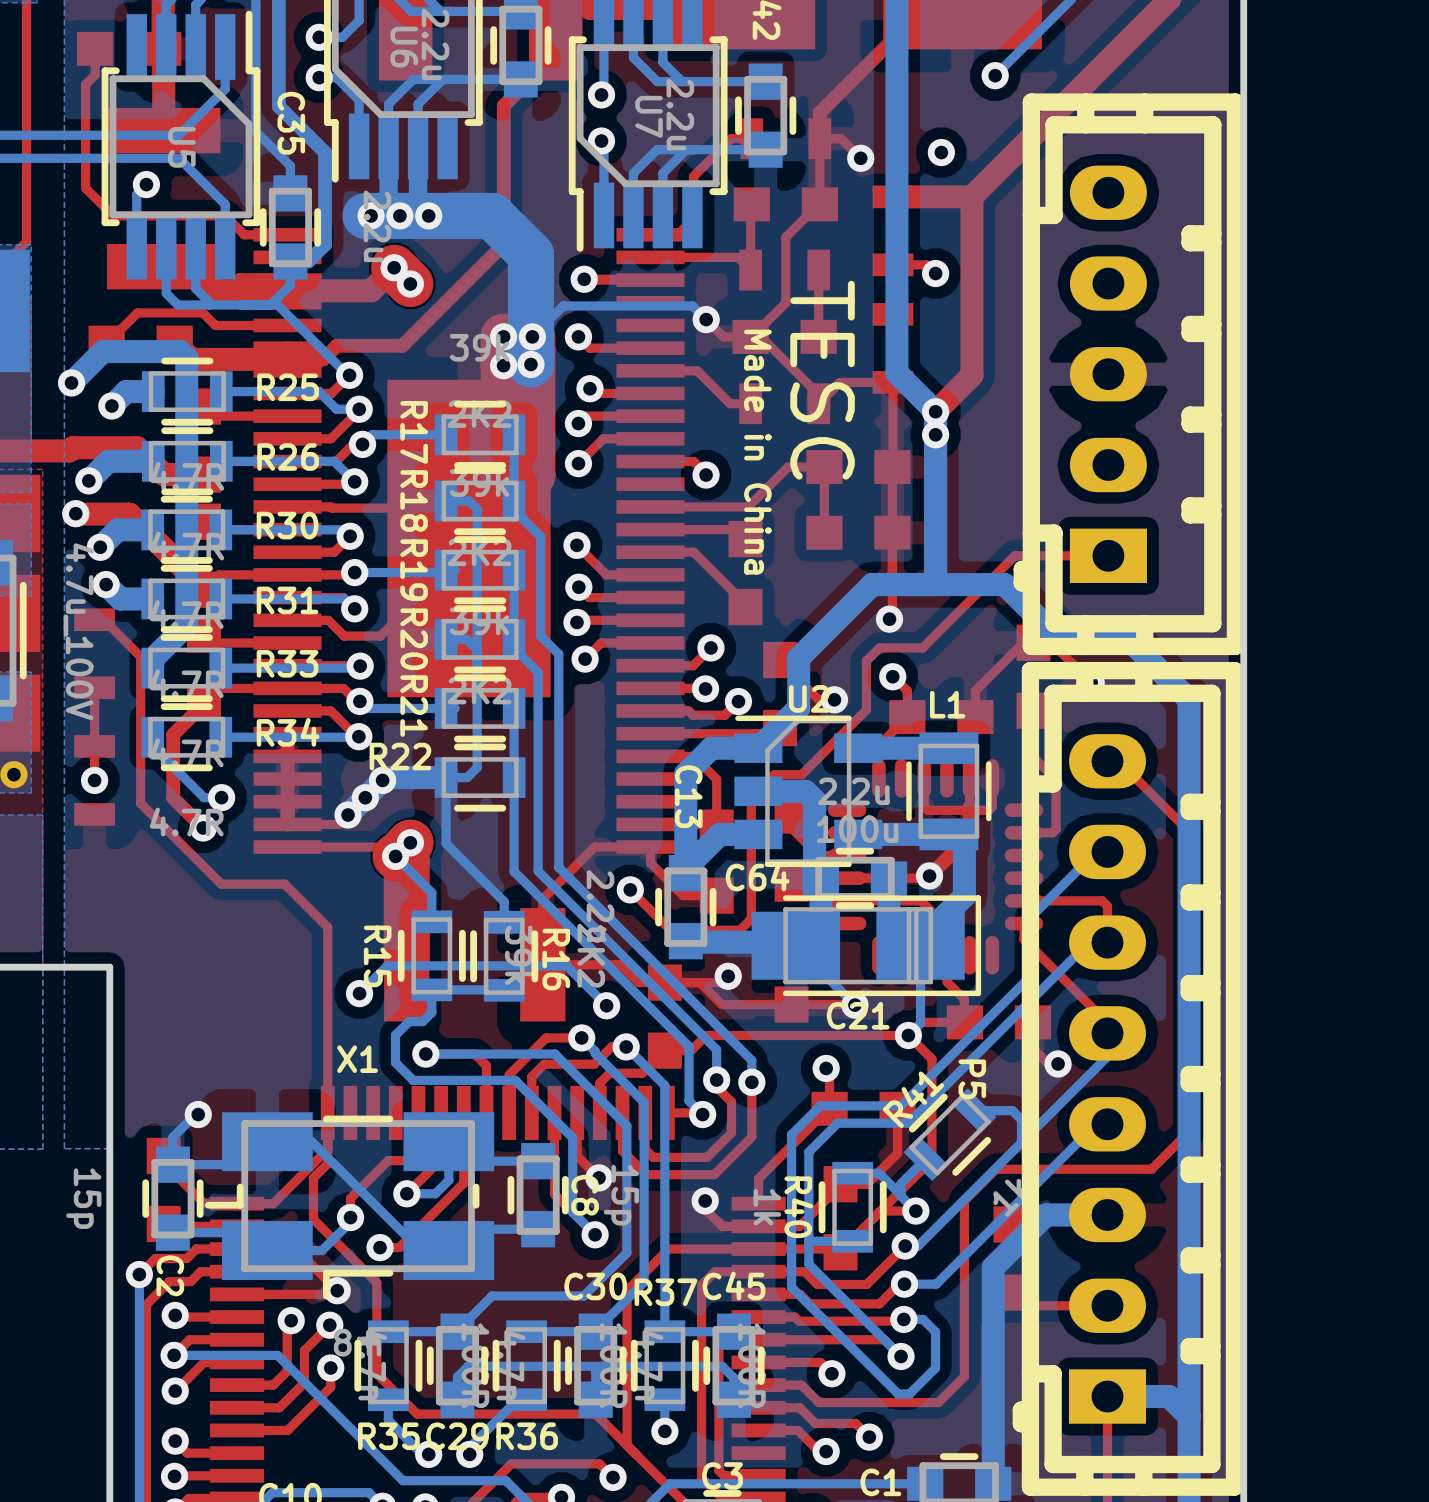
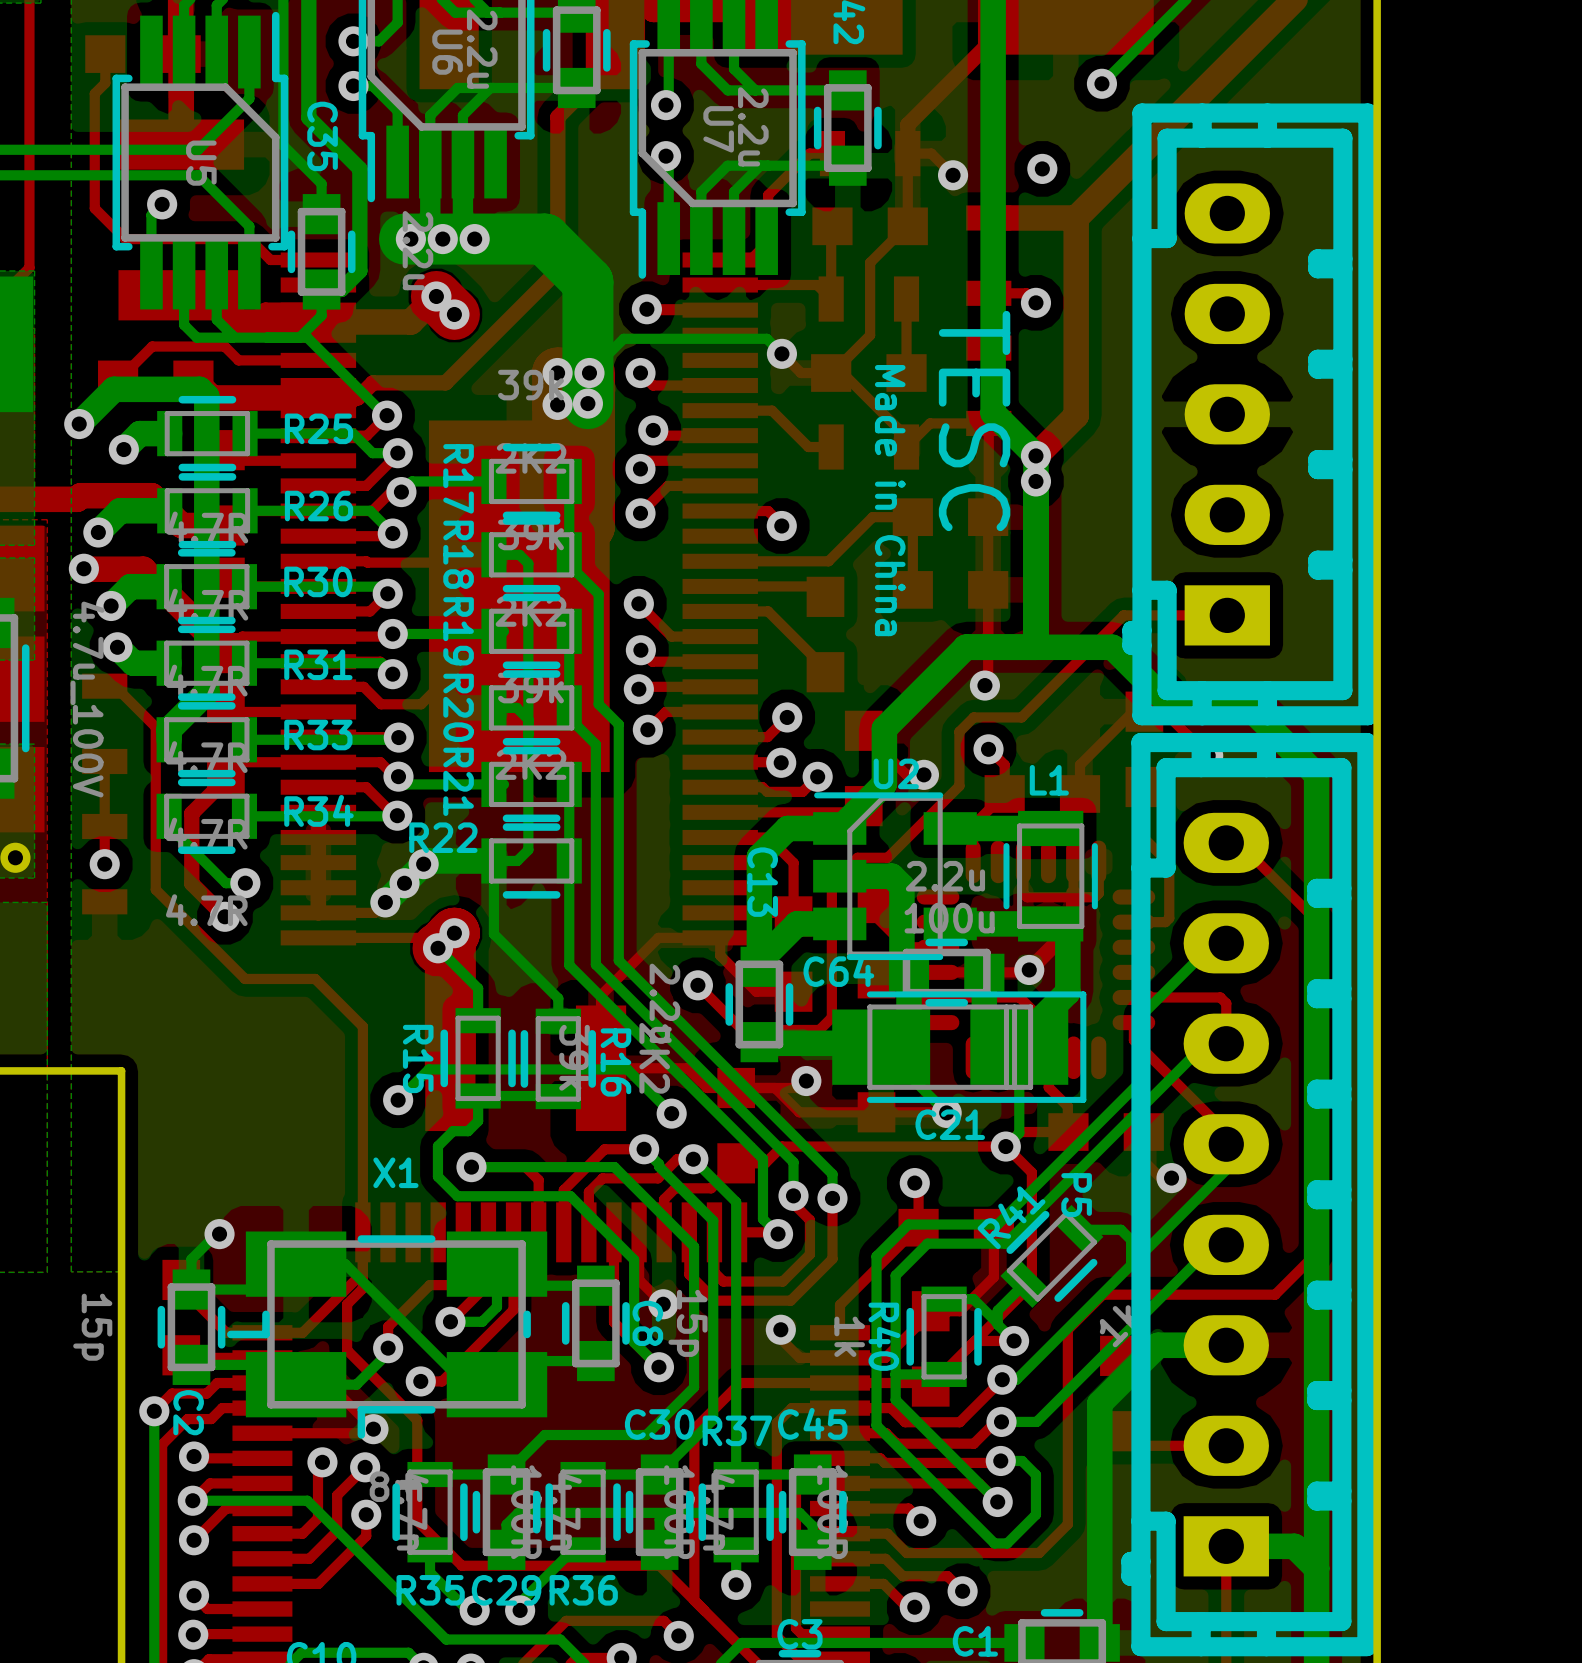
text position: TESC (822, 380) -> TESC (974, 421)
text position: Made in China (757, 452) -> Made in China (890, 500)

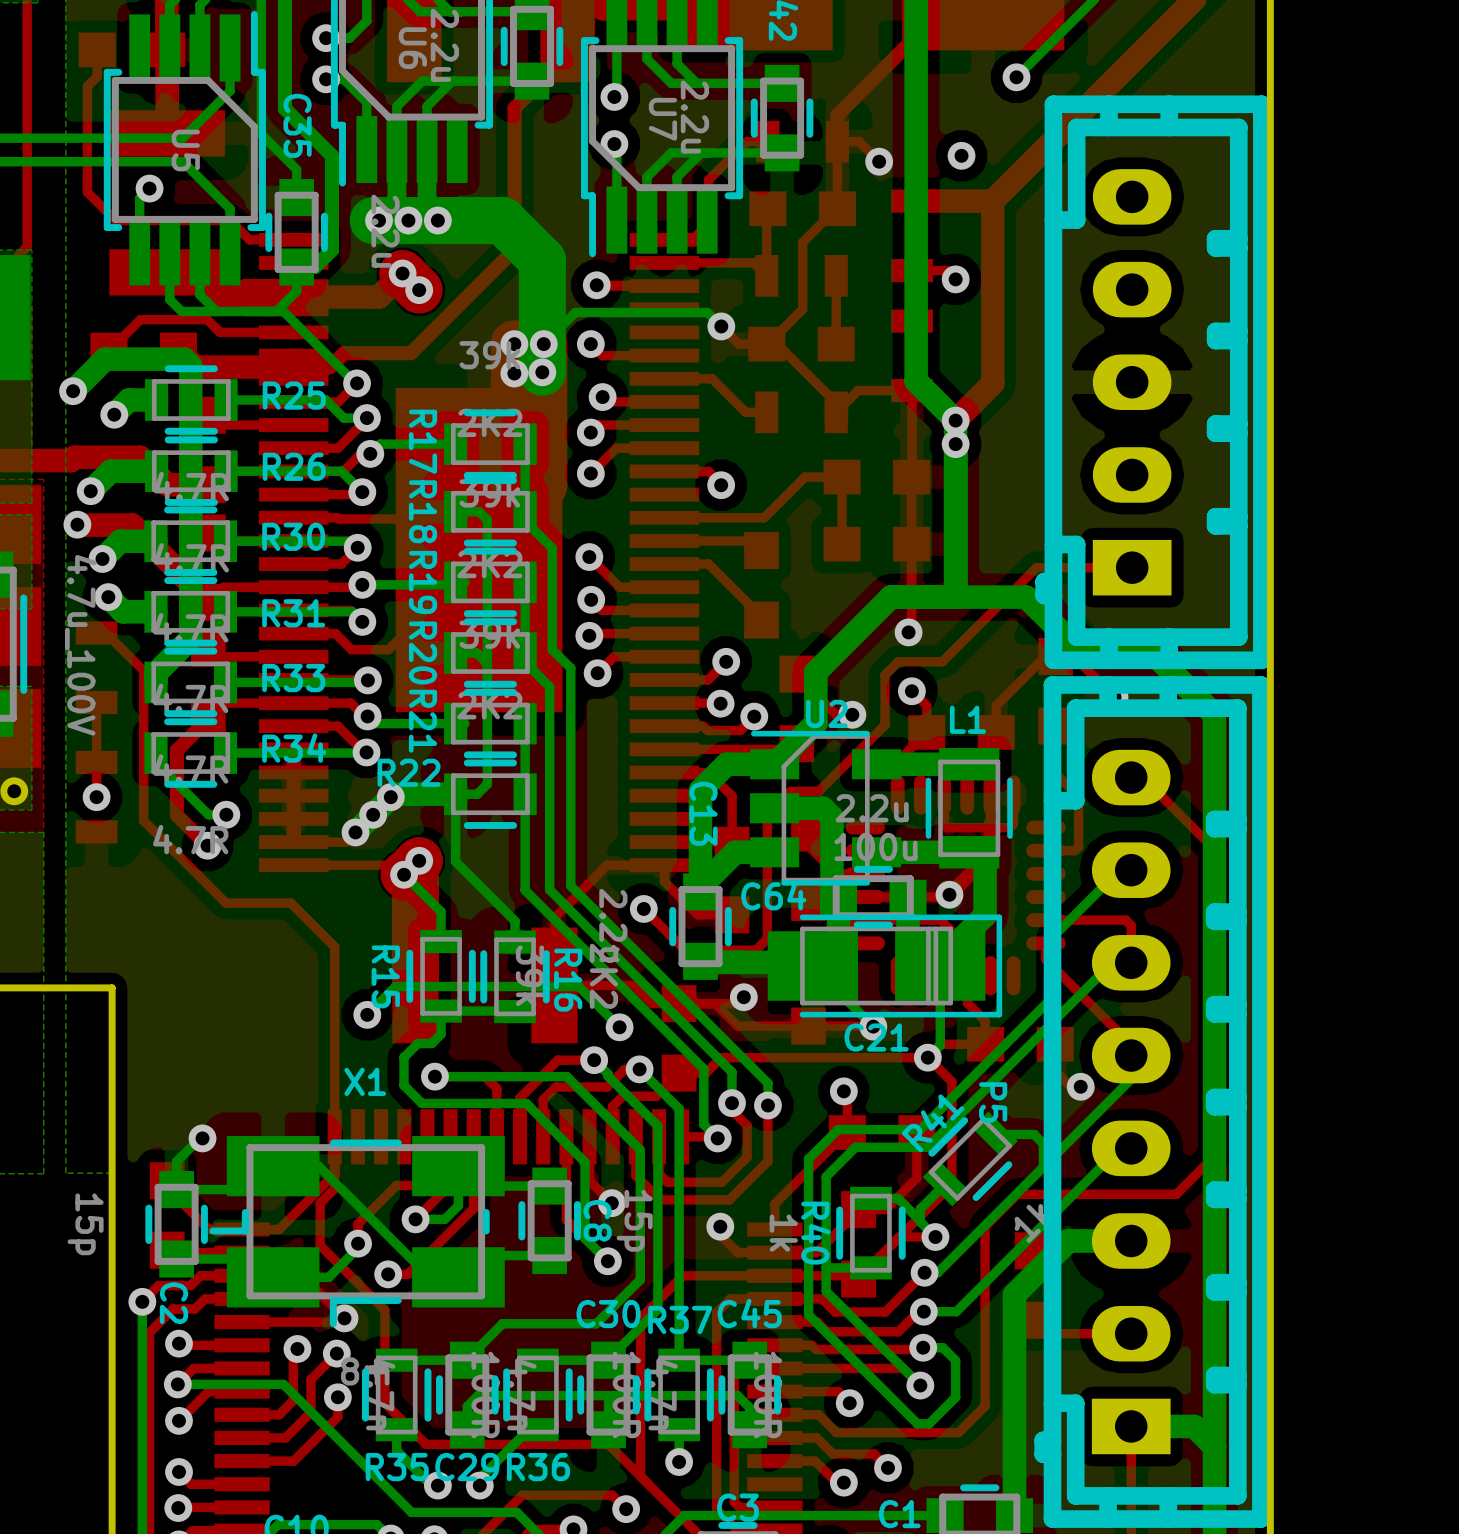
text: TESC (974, 421) -> none
text: Made in China (890, 500) -> none

